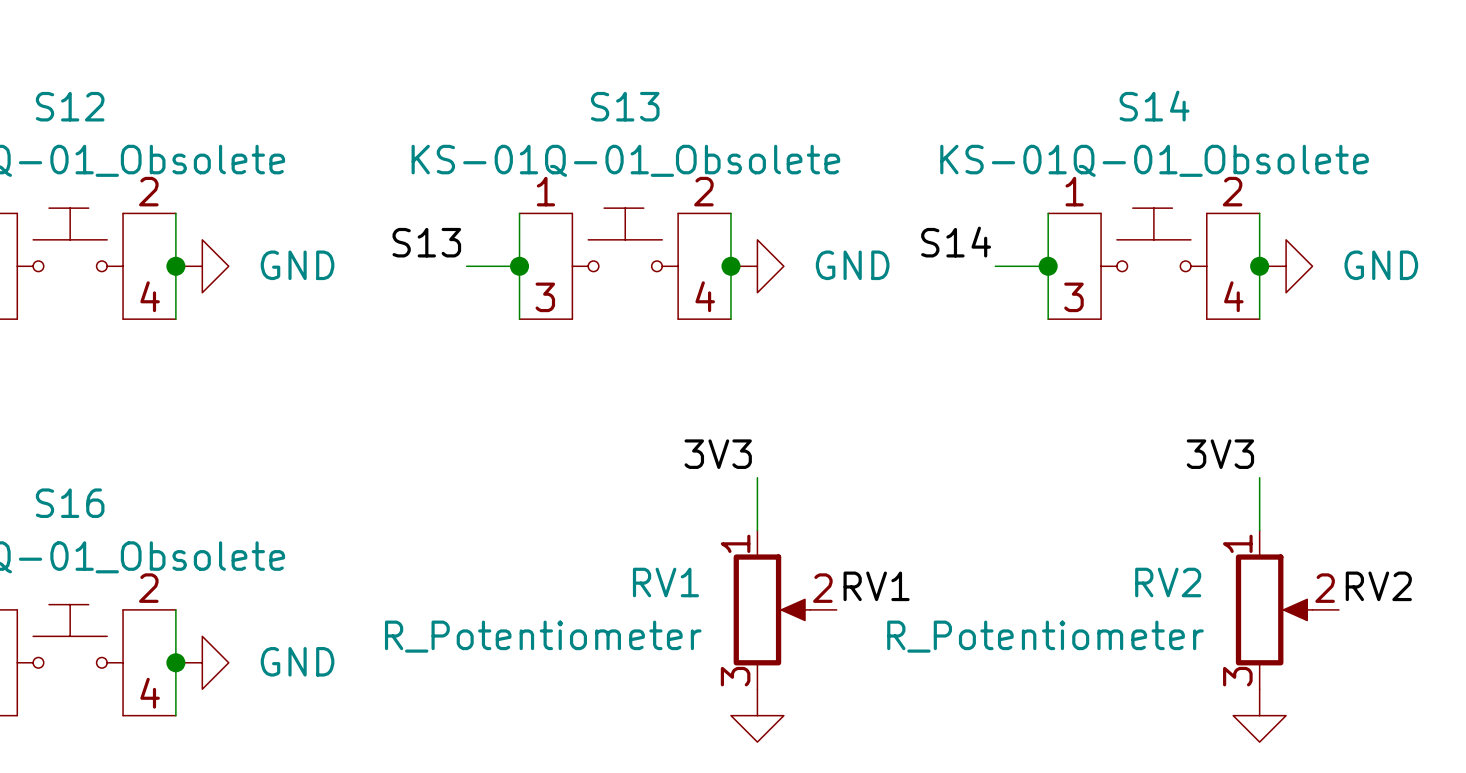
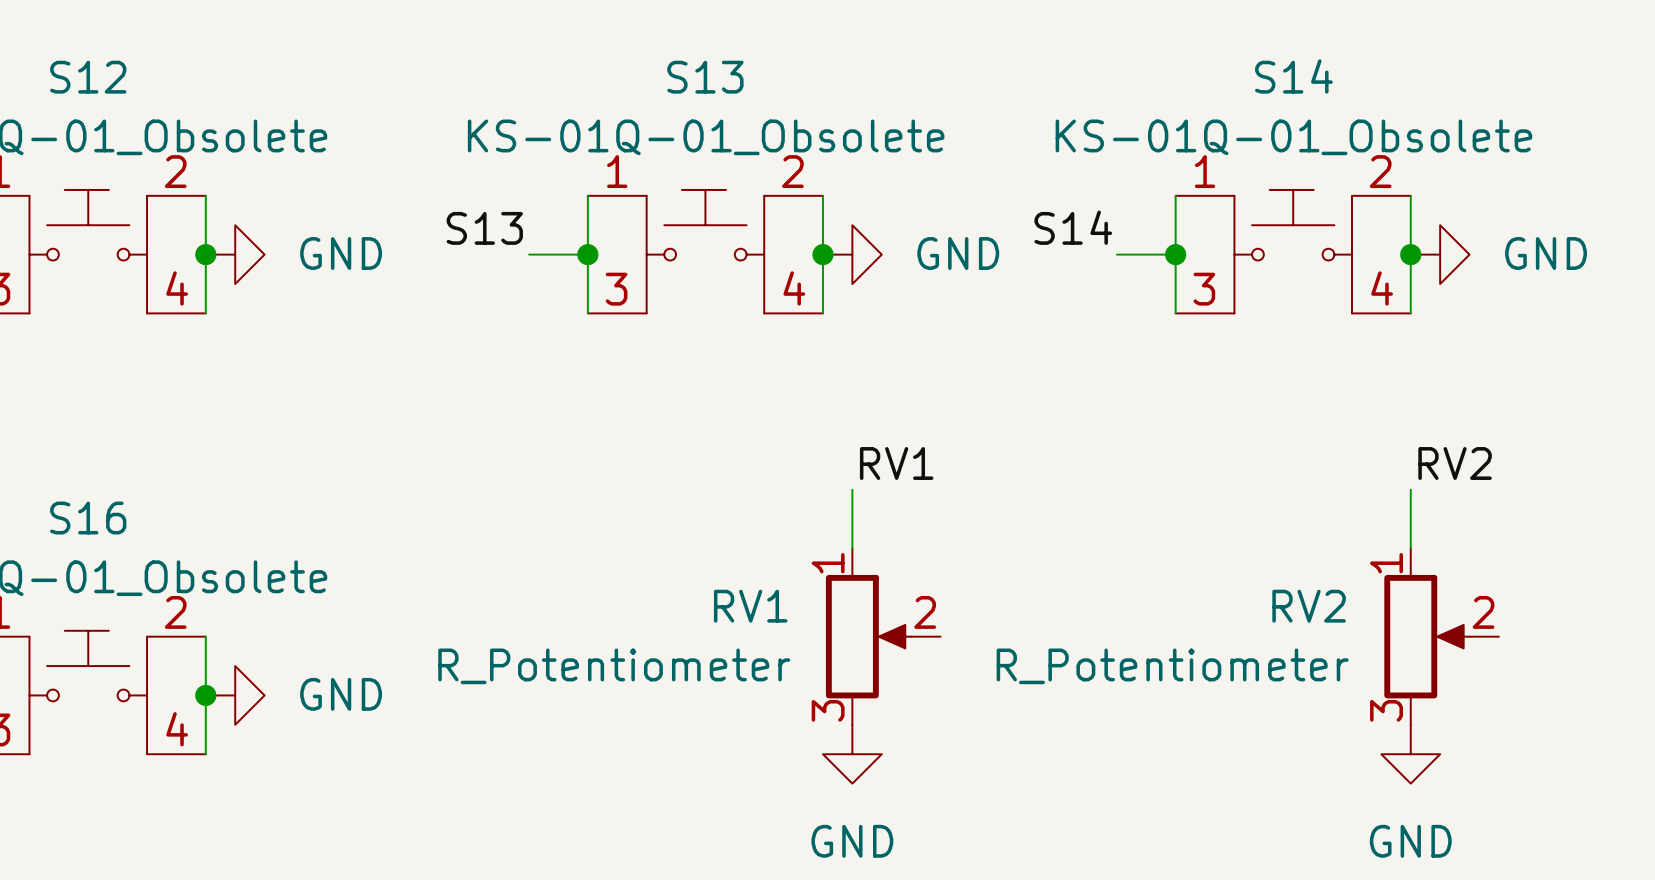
label: 3V3 (718, 454) -> RV1 (896, 463)
label: 3V3 (1220, 454) -> RV2 (1455, 463)
label: RV1 (876, 586) -> none
label: RV2 (1378, 586) -> none

